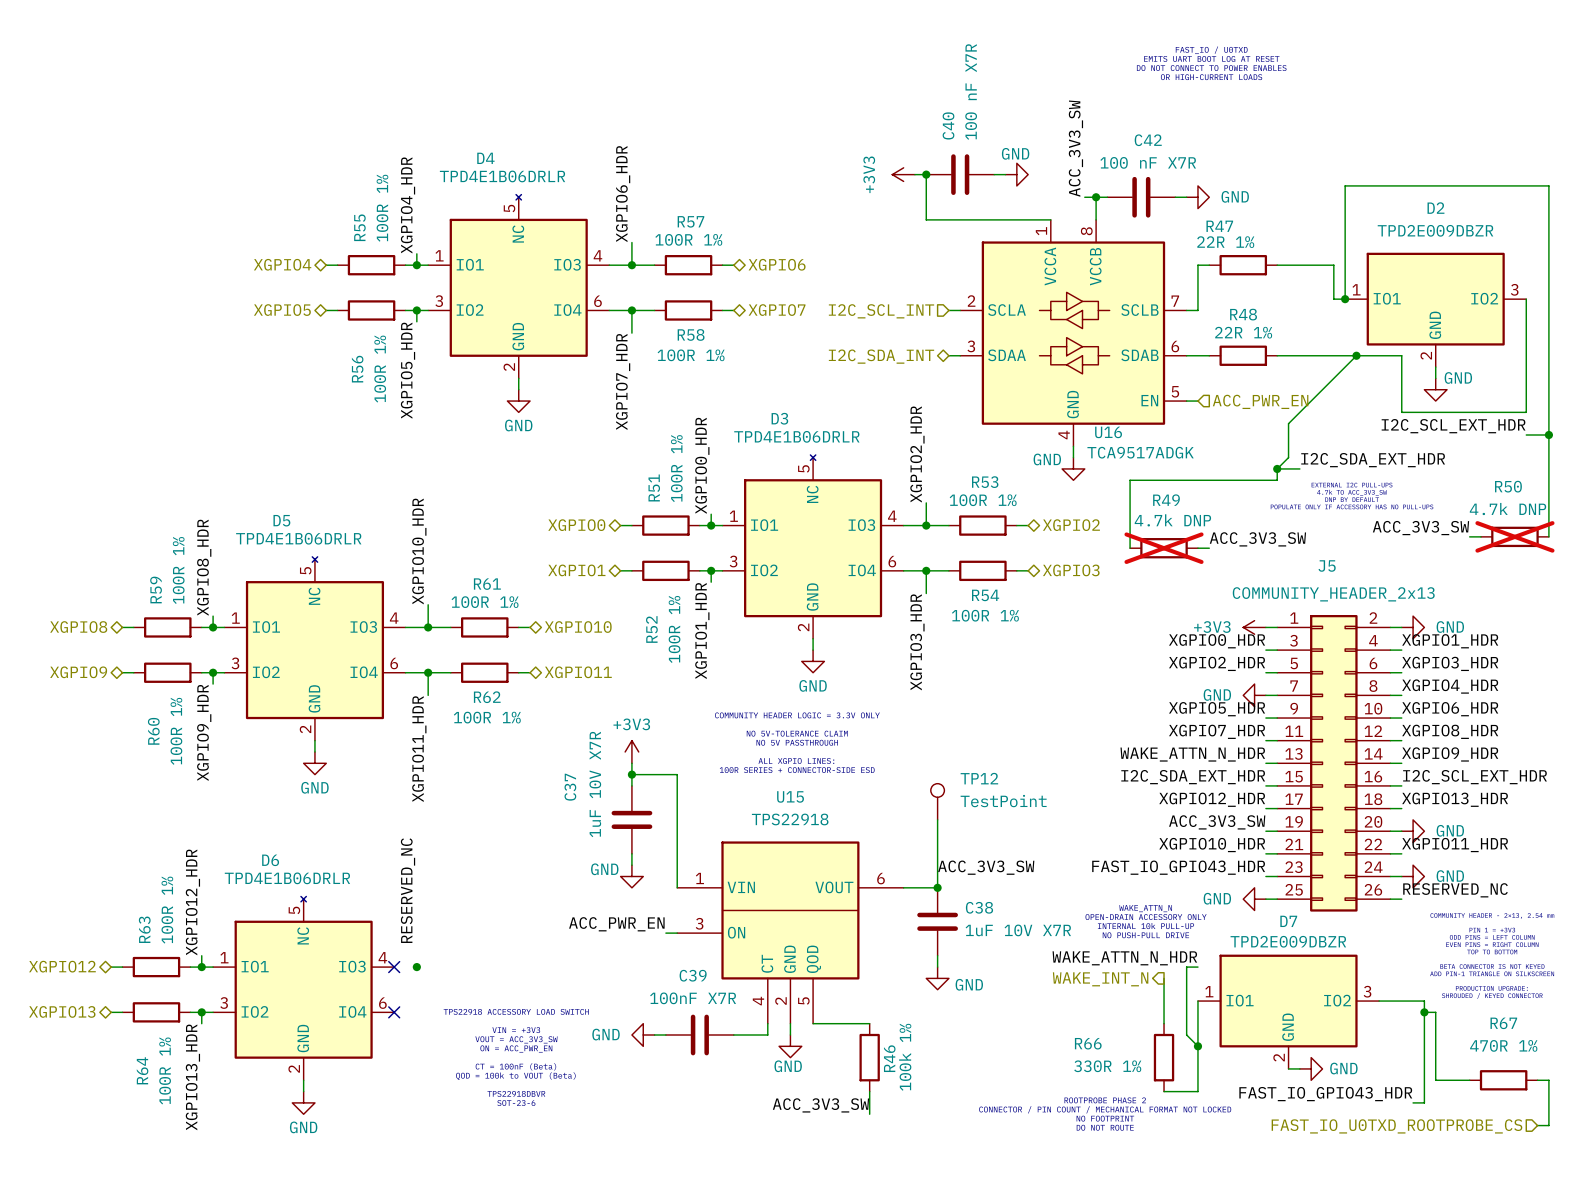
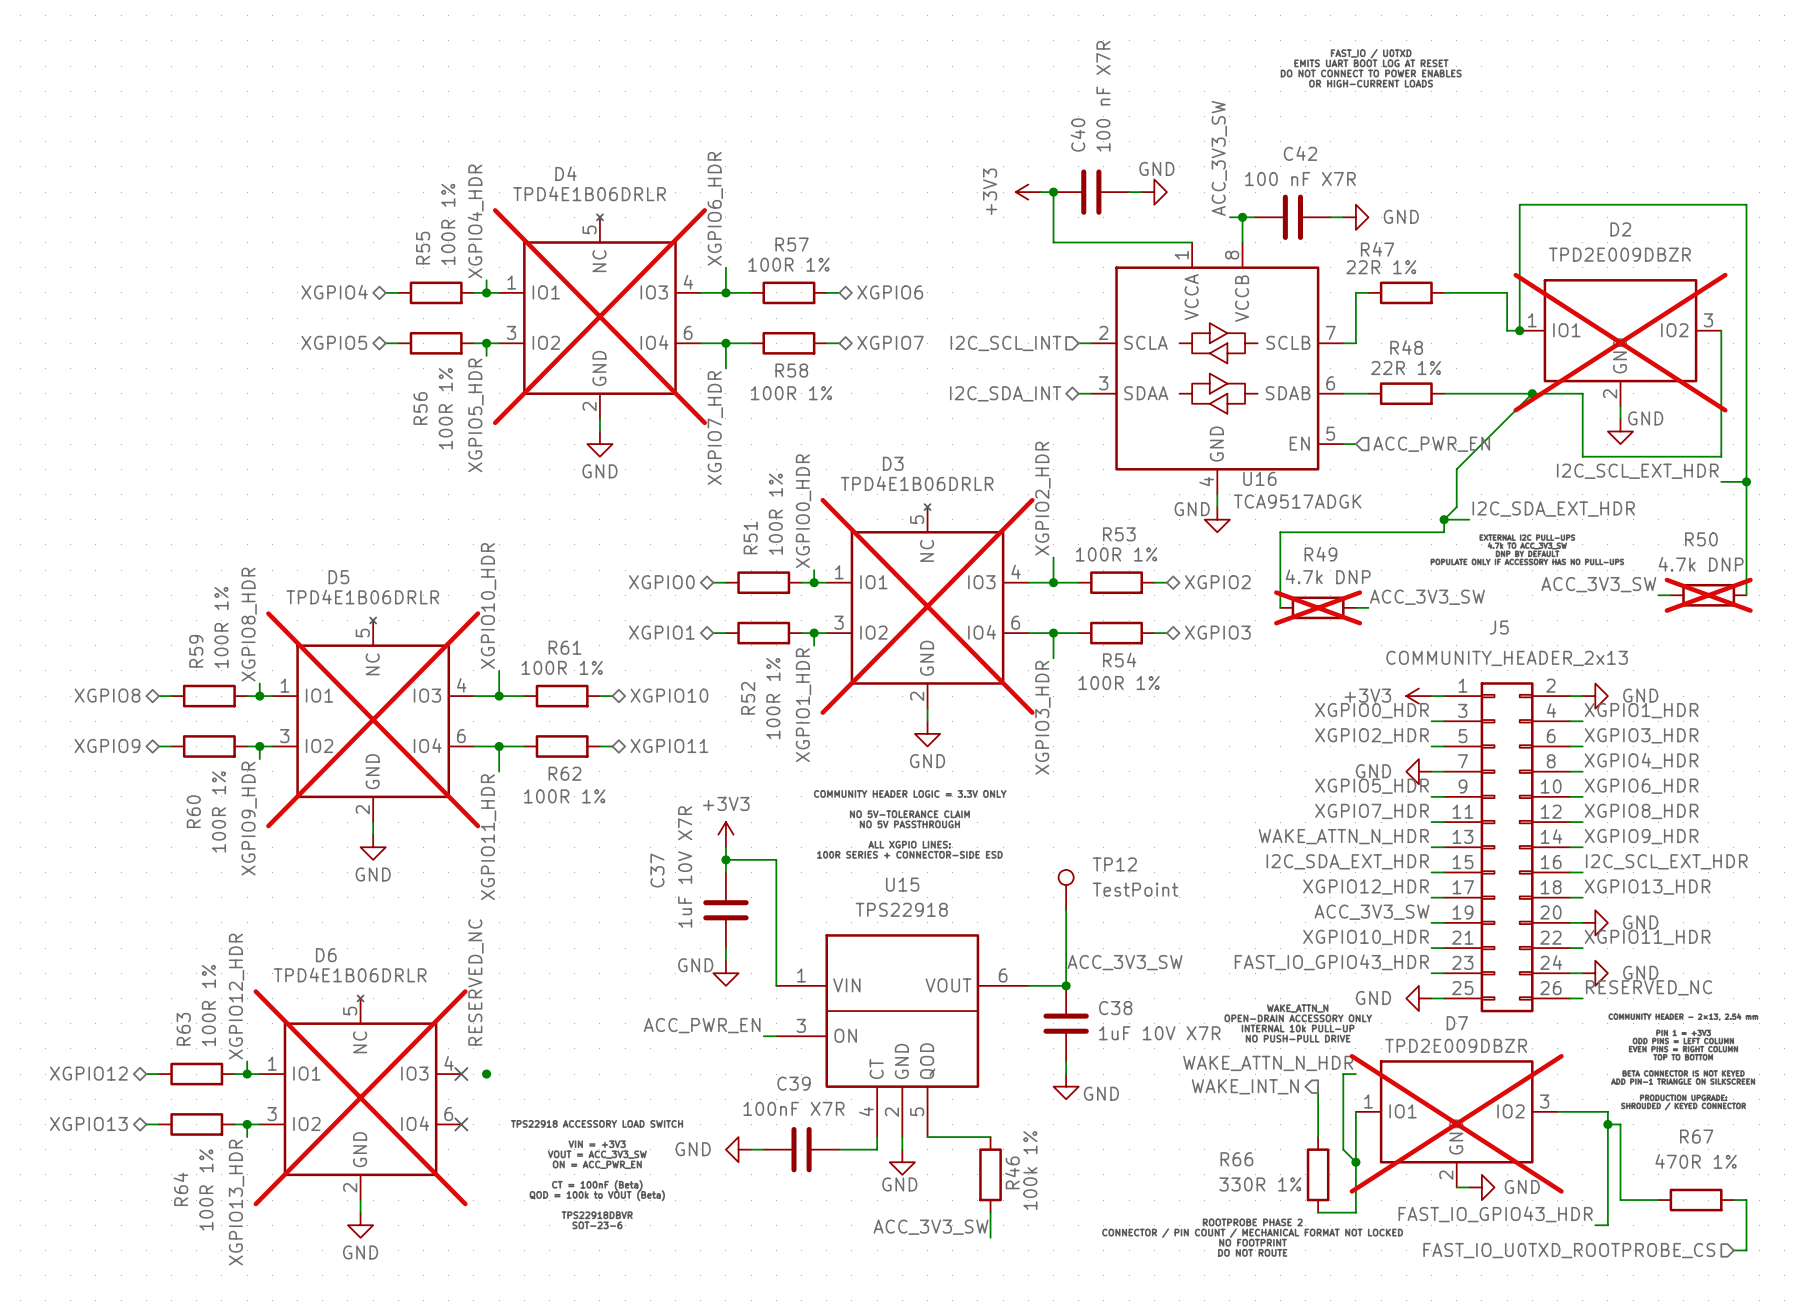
D4 do-not-place cross: none -> (599, 316)
D2 do-not-place cross: none -> (1620, 342)
D3 do-not-place cross: none -> (927, 606)
D5 do-not-place cross: none -> (373, 719)
D6 do-not-place cross: none -> (360, 1097)
D7 do-not-place cross: none -> (1456, 1123)

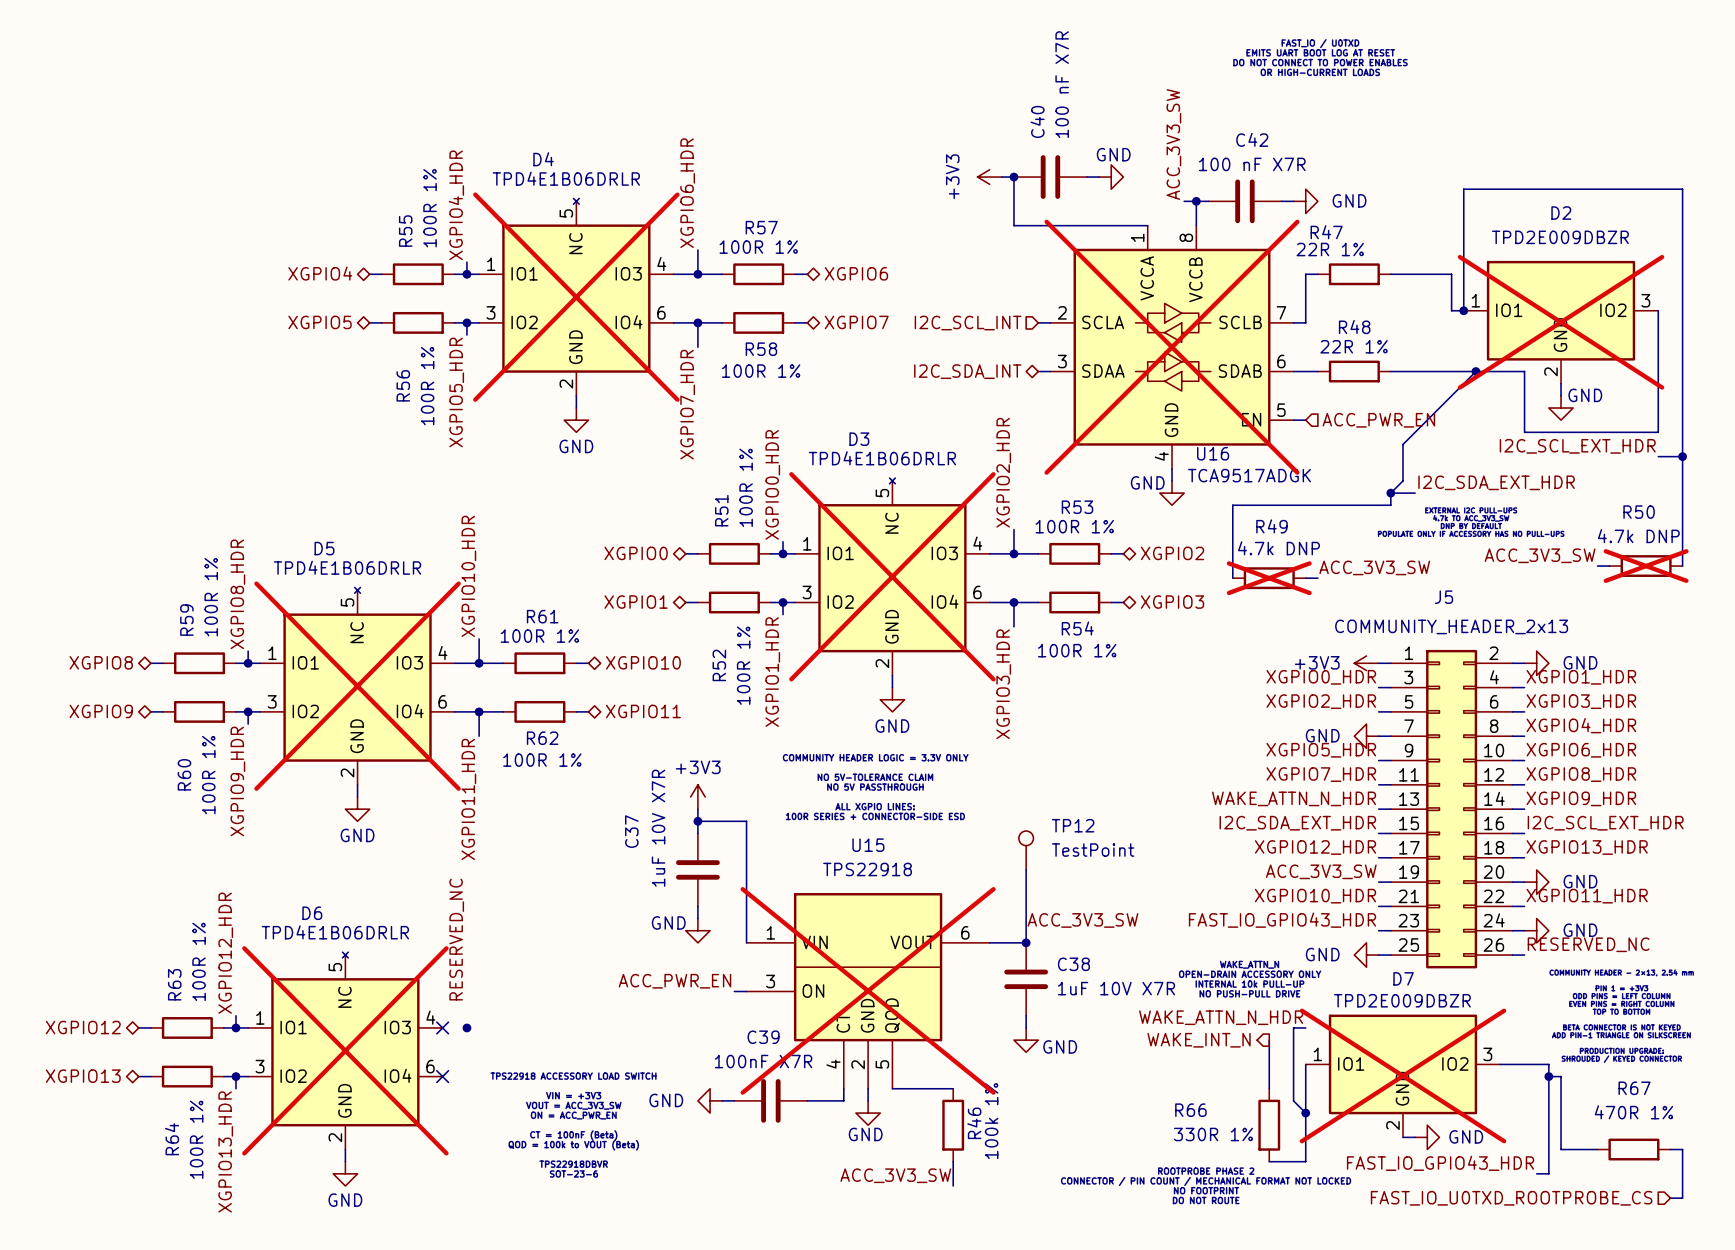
U16 do-not-place cross: none -> (1172, 347)
U15 do-not-place cross: none -> (868, 990)

